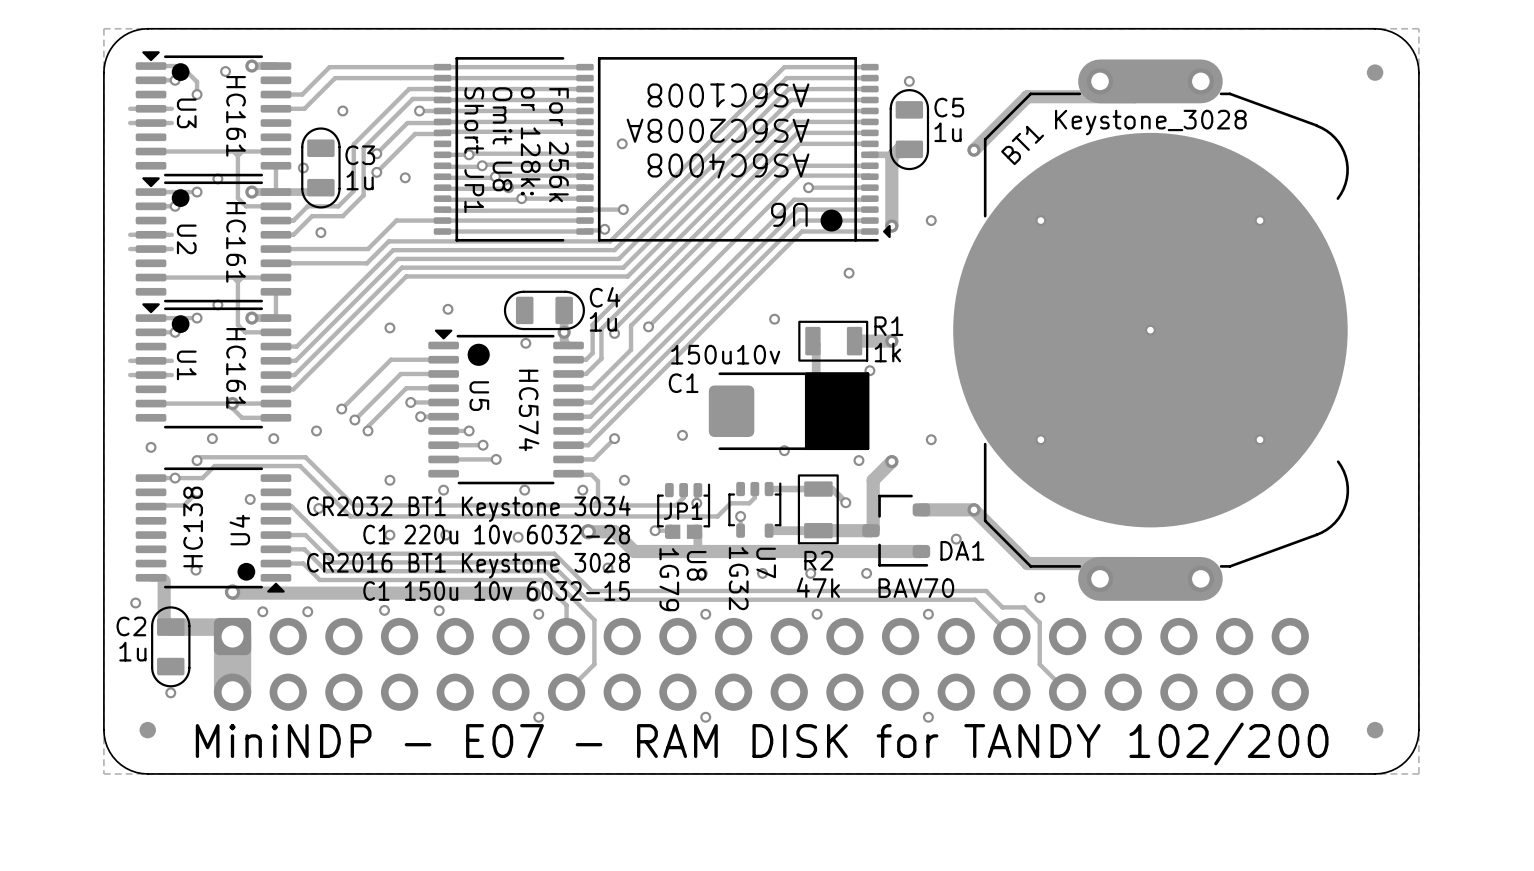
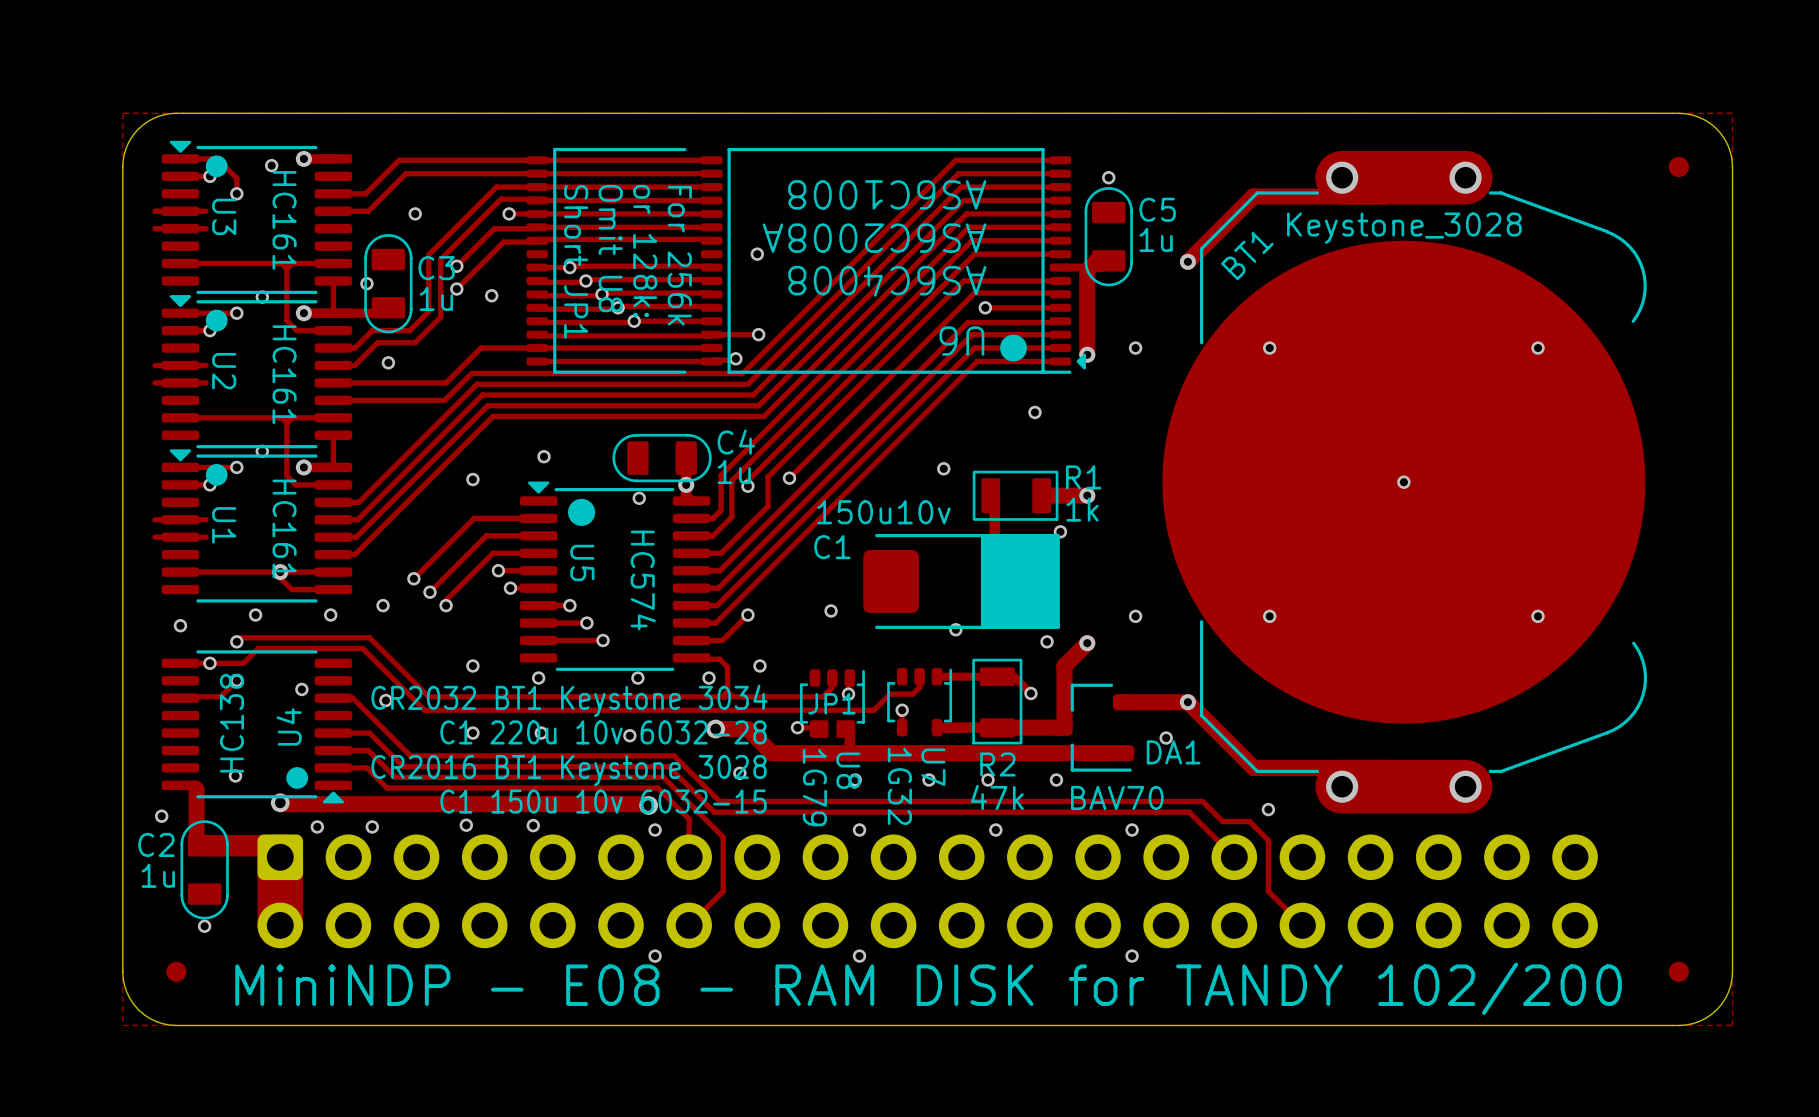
text: MiniNDP - E07 - RAM DISK for TANDY 102/200 (762, 743) -> MiniNDP - E08 - RAM DISK for TANDY 102/200 (928, 988)

